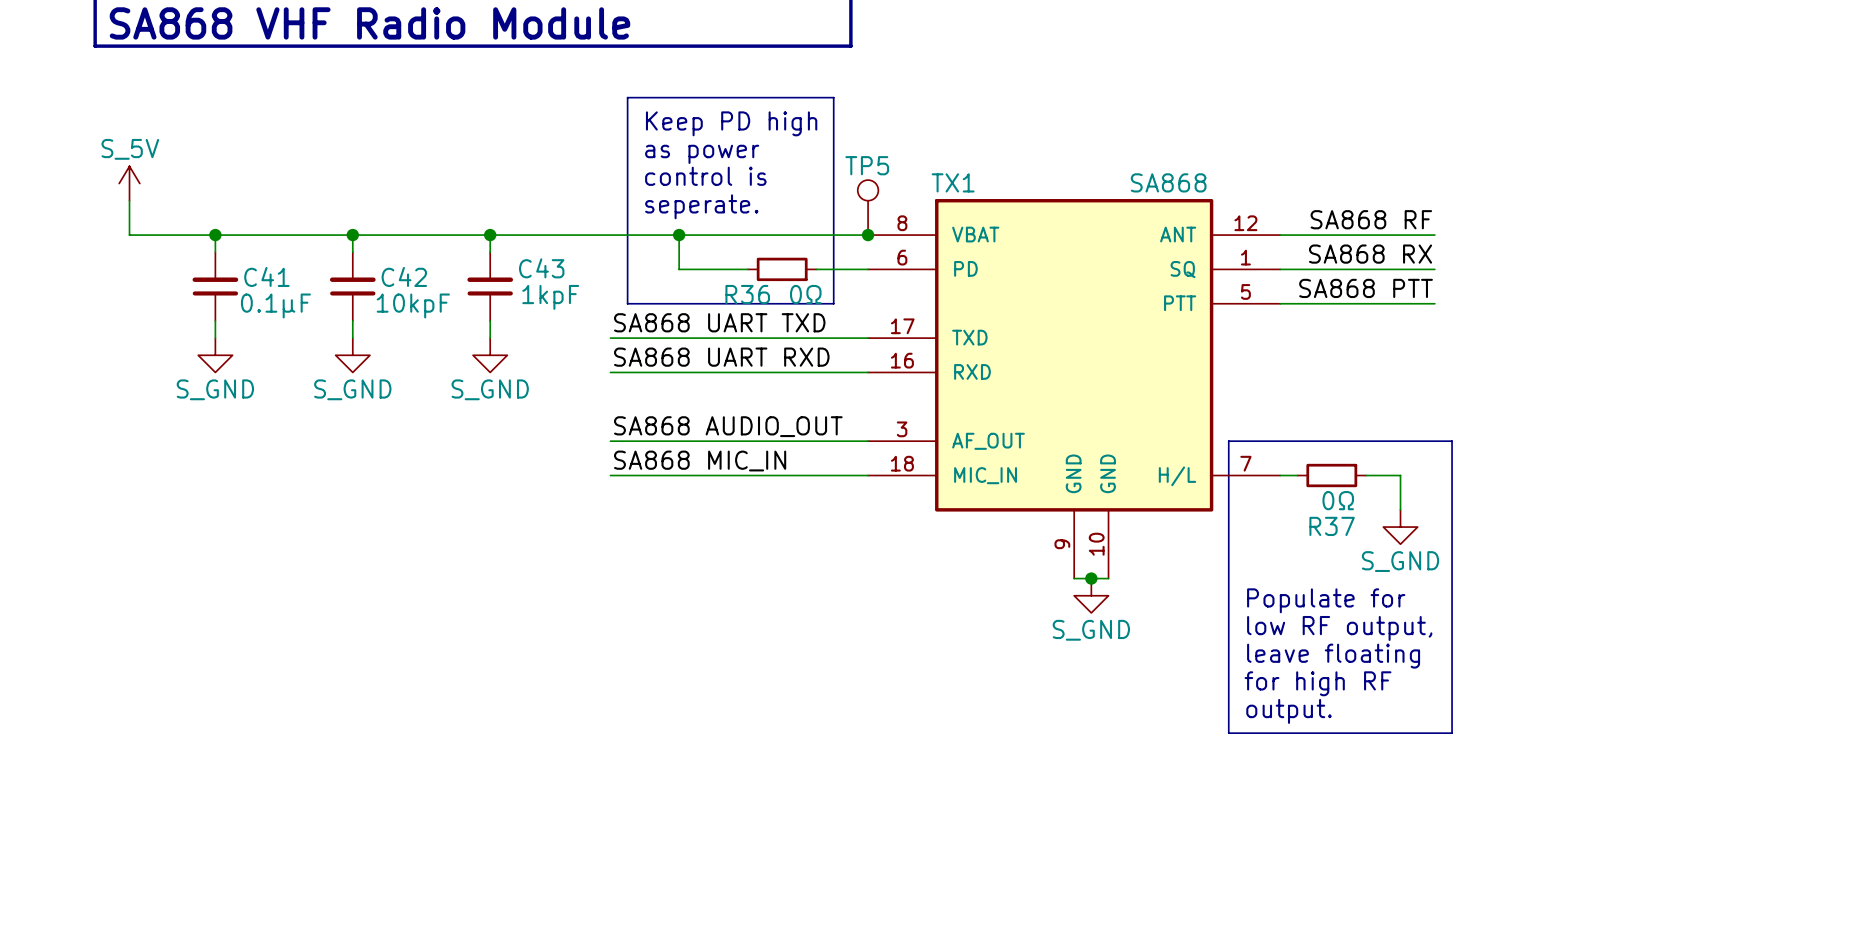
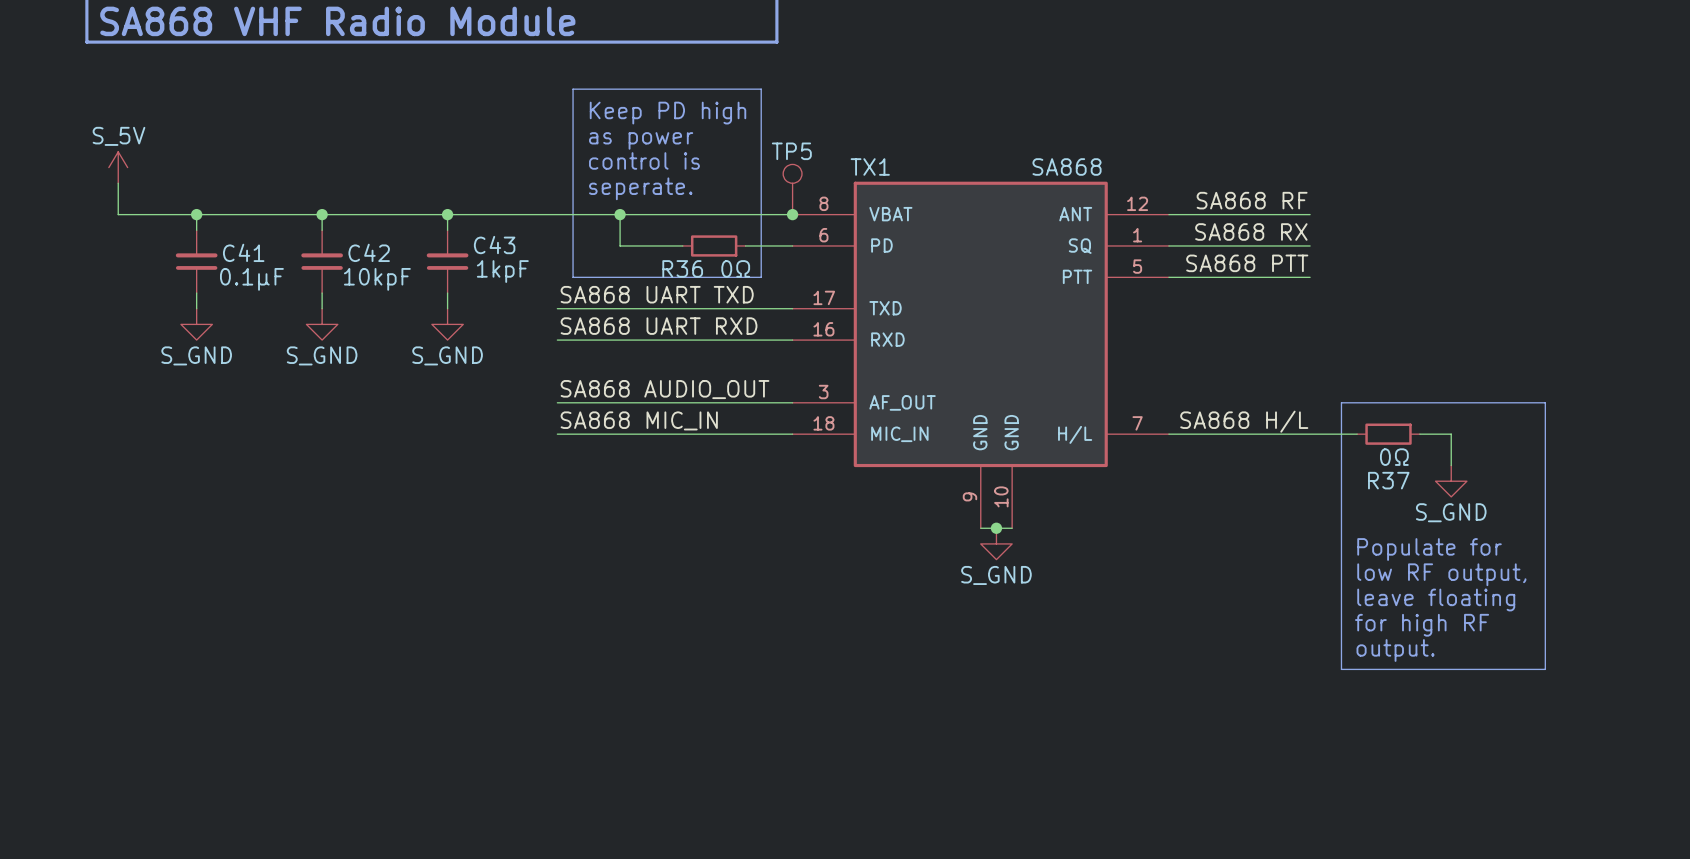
line: (1228, 441) (1452, 441) (1452, 733) (1228, 733) (1228, 441) -> (1341, 402) (1545, 402) (1545, 669) (1341, 669) (1341, 402)
label: none -> SA868 H/L (1244, 421)
wire: none -> (1184, 434) (1247, 434)
R37 position: (1331, 475) -> (1388, 434)
wire: (1400, 475) (1400, 509) -> (1278, 434) (1357, 434)
wire: none -> (1419, 434) (1451, 434) (1451, 465)
power symbol position: S_GND (1400, 527) -> S_GND (1451, 481)
text position: Populate for (1326, 600) -> Populate for (1429, 549)
text position: low RF output, (1339, 628) -> low RF output, (1441, 574)
text position: leave floating (1333, 656) -> leave floating (1436, 600)
text position: for high RF (1318, 683) -> for high RF (1422, 625)
text position: output. (1289, 711) -> output. (1395, 650)

